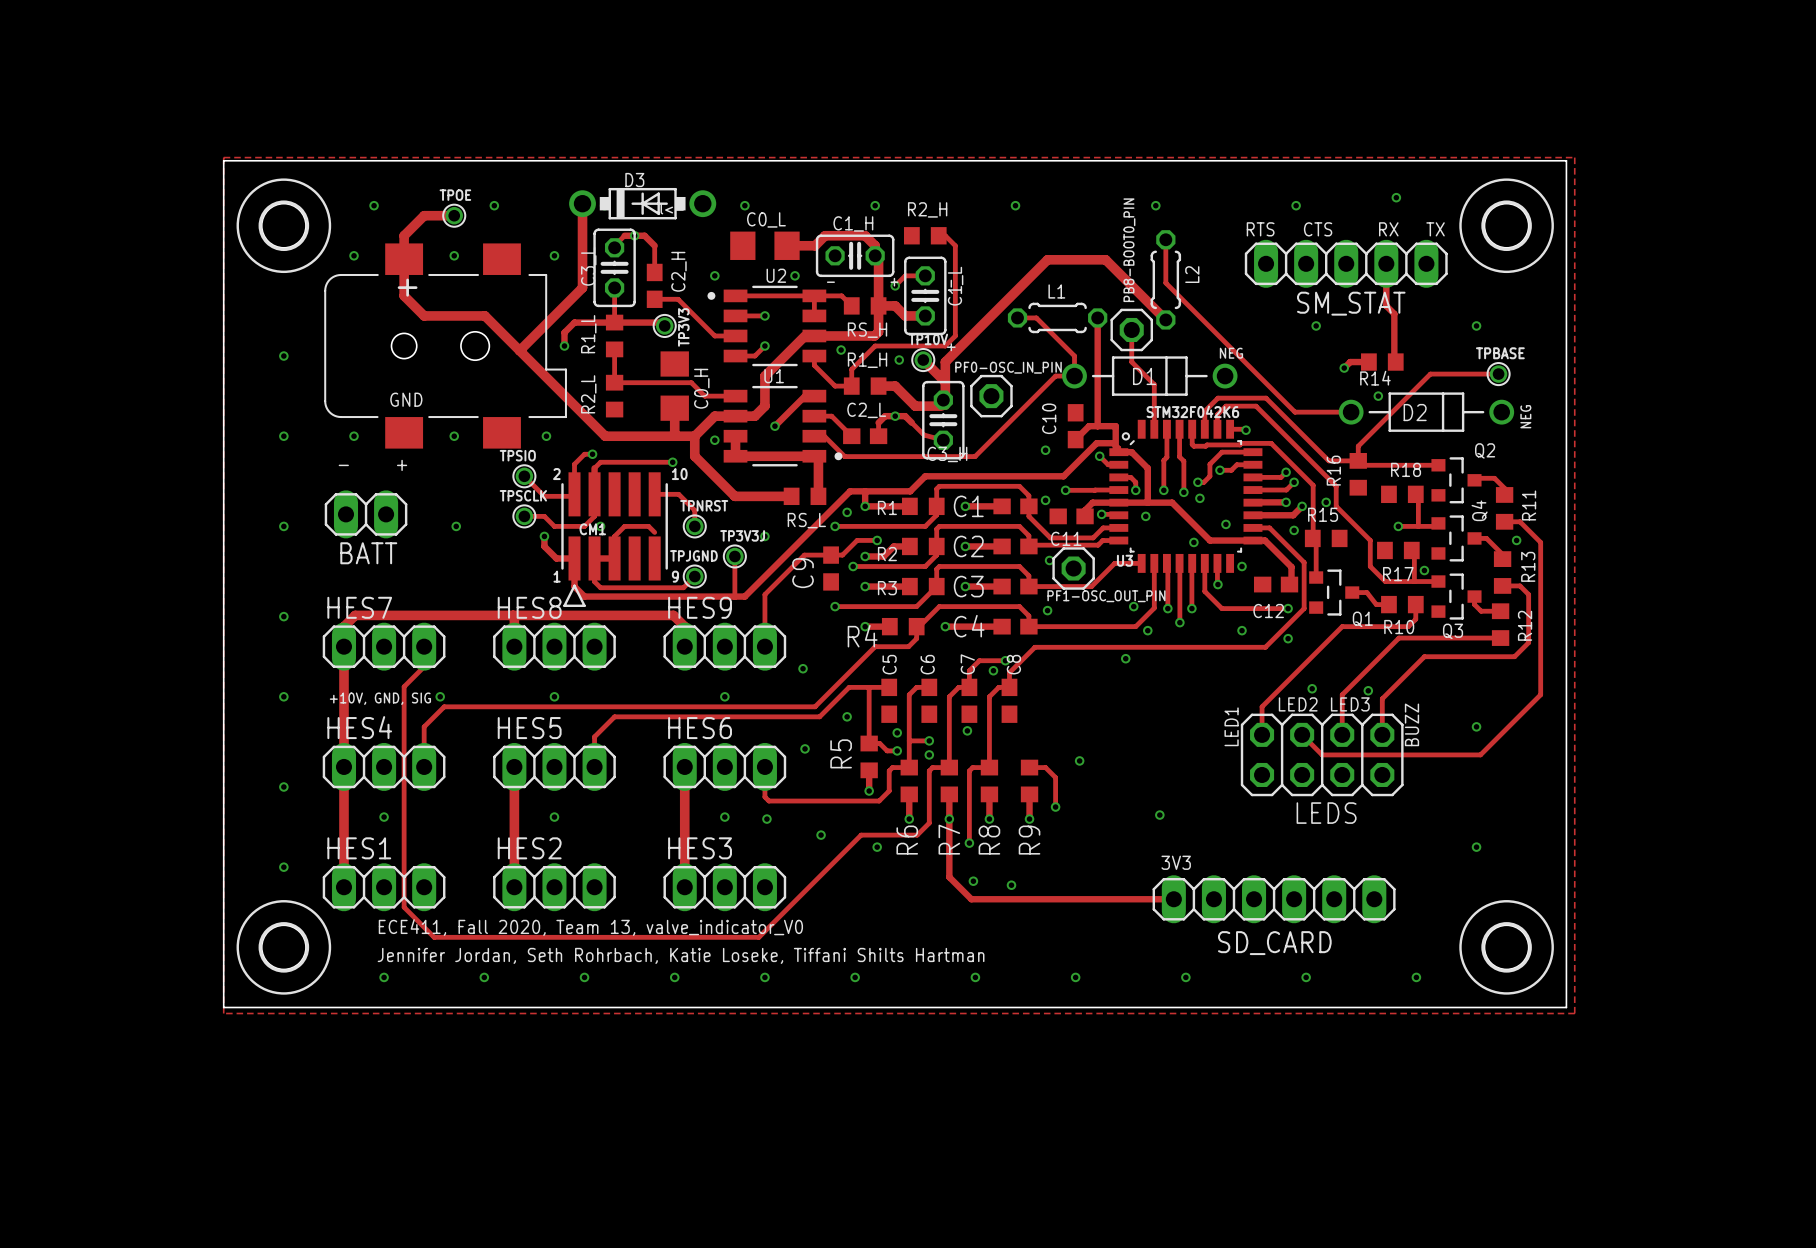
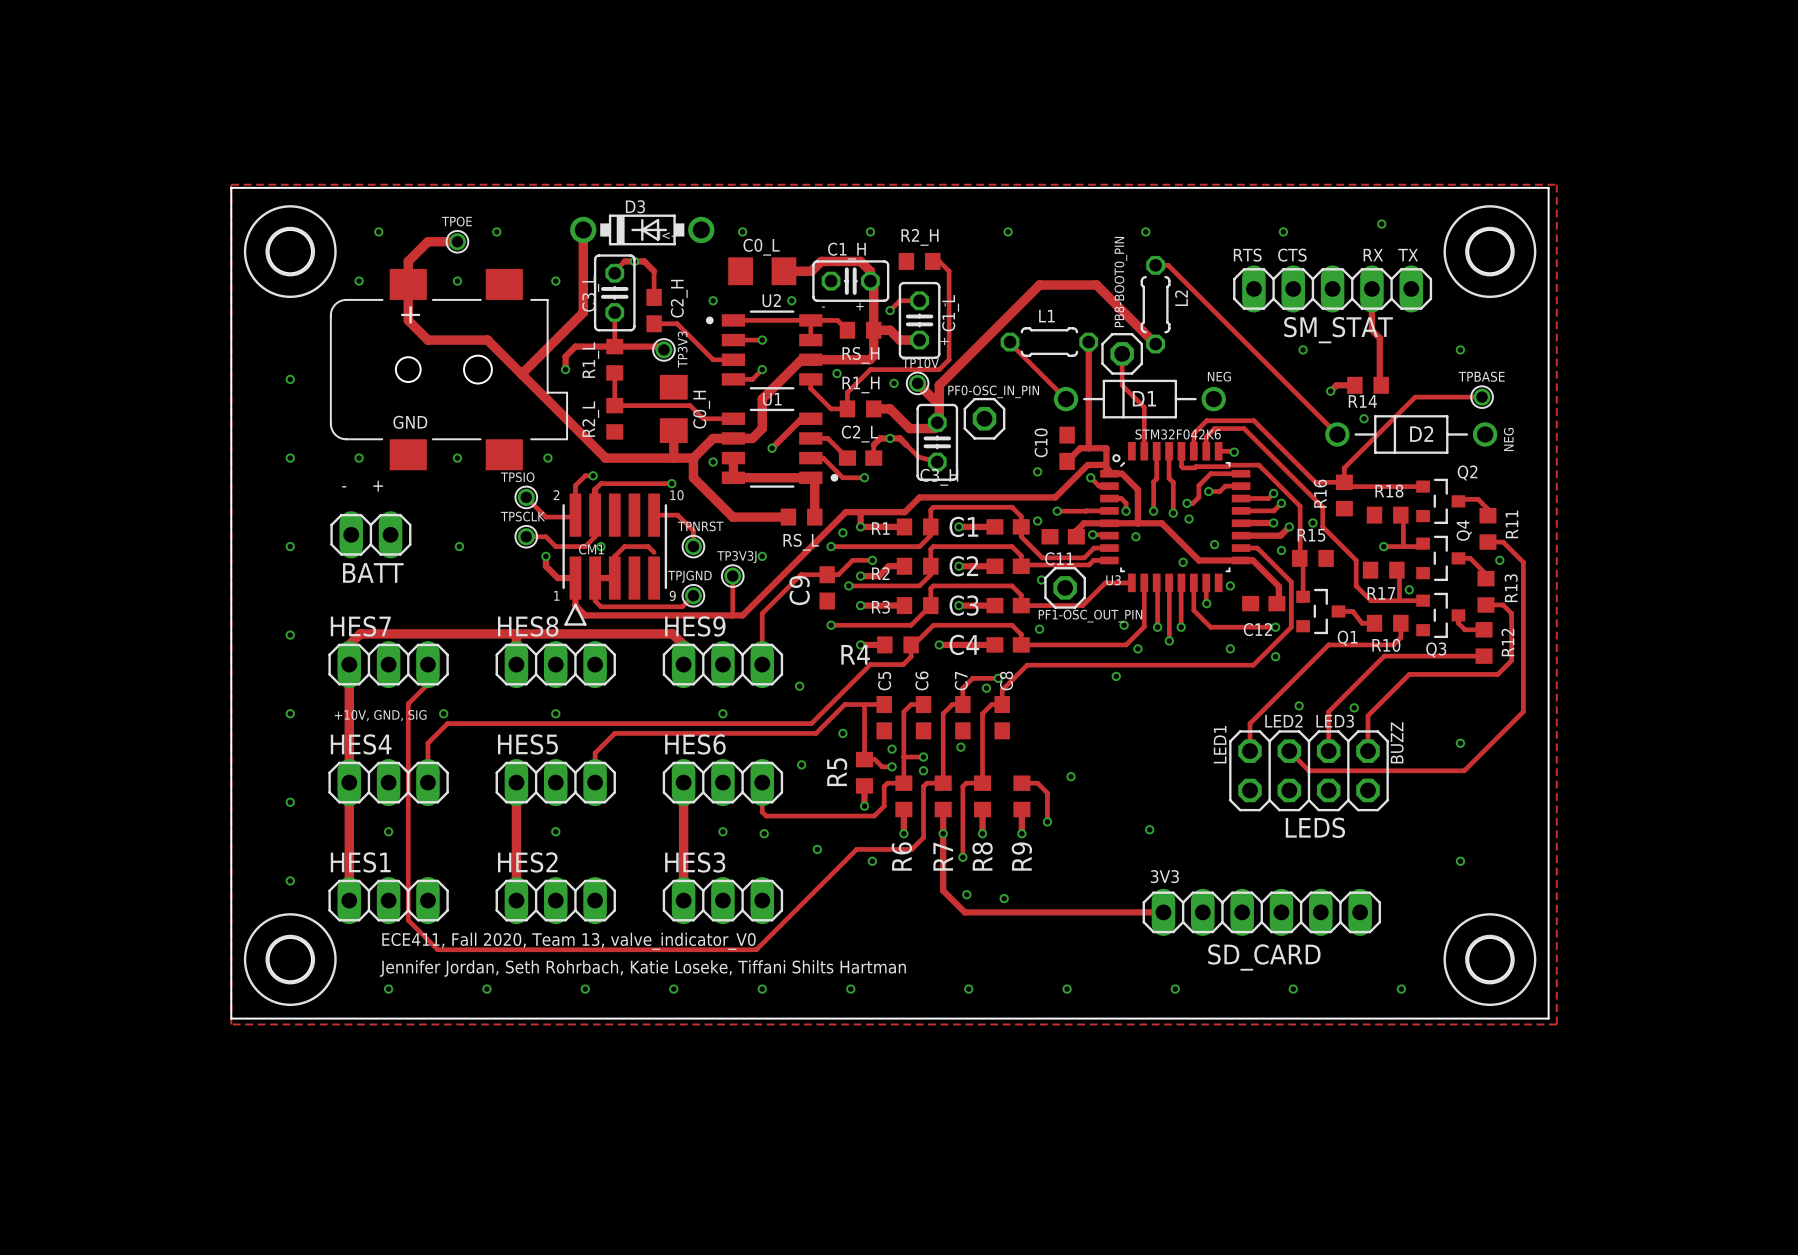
track: (1165, 239) (1165, 282) (1295, 412) (1351, 412) -> (1155, 265) (1168, 265) (1337, 434)
track: (1017, 317) (1036, 317) (1074, 356) (1074, 376) (1055, 376) (975, 456) (844, 456) (824, 436) -> (864, 477) (842, 477) (823, 458) (820, 458)
track: none -> (1010, 342) (1066, 399)
D1 rotation: 0° (1149, 376) -> 180° (1139, 399)
D2 rotation: 0° (1426, 412) -> 180° (1411, 434)
via: none -> (864, 477)

